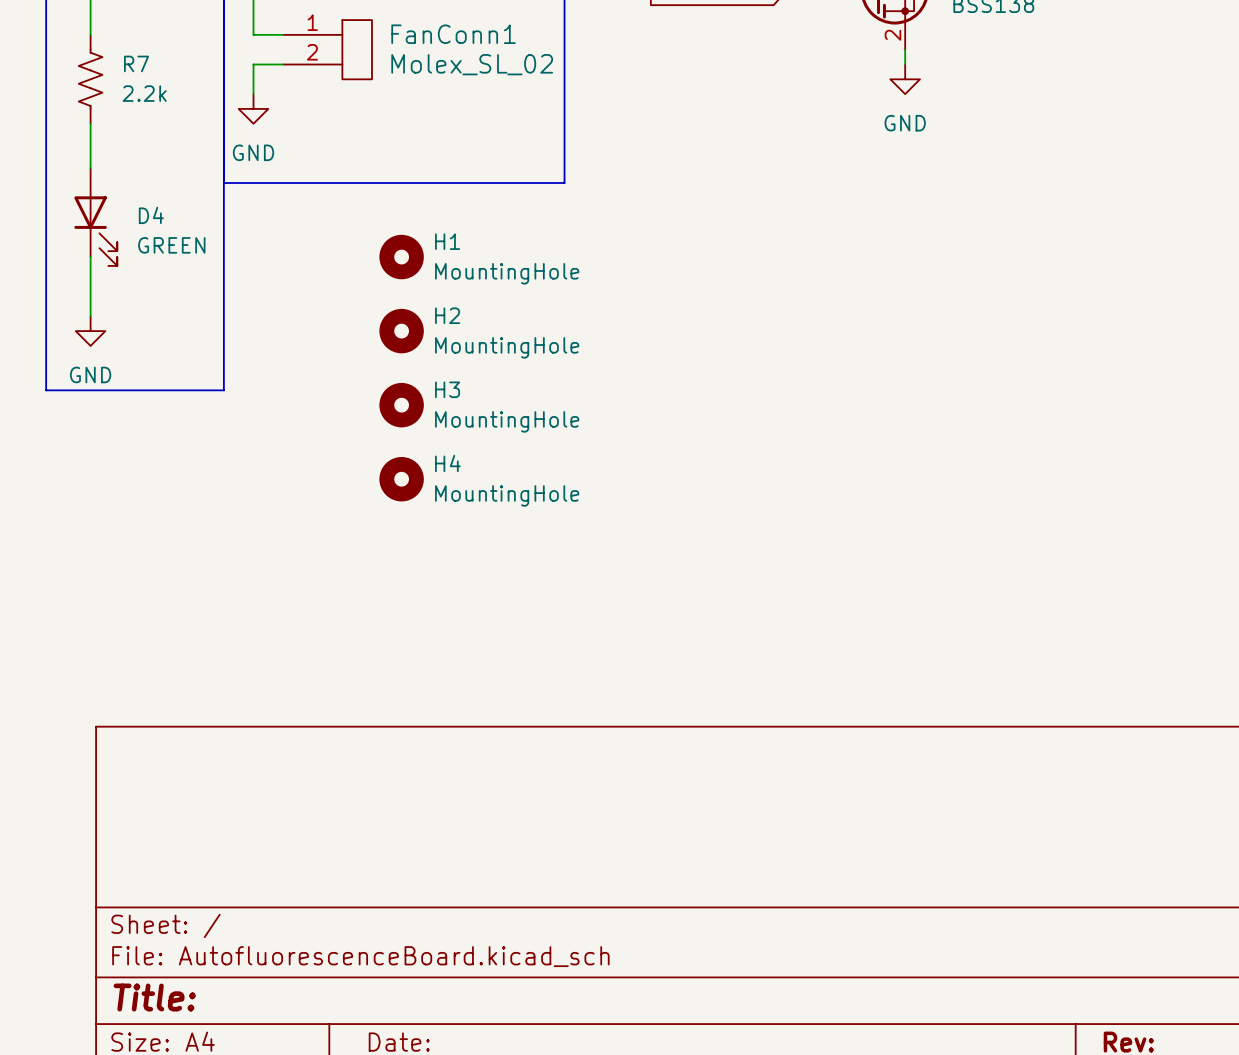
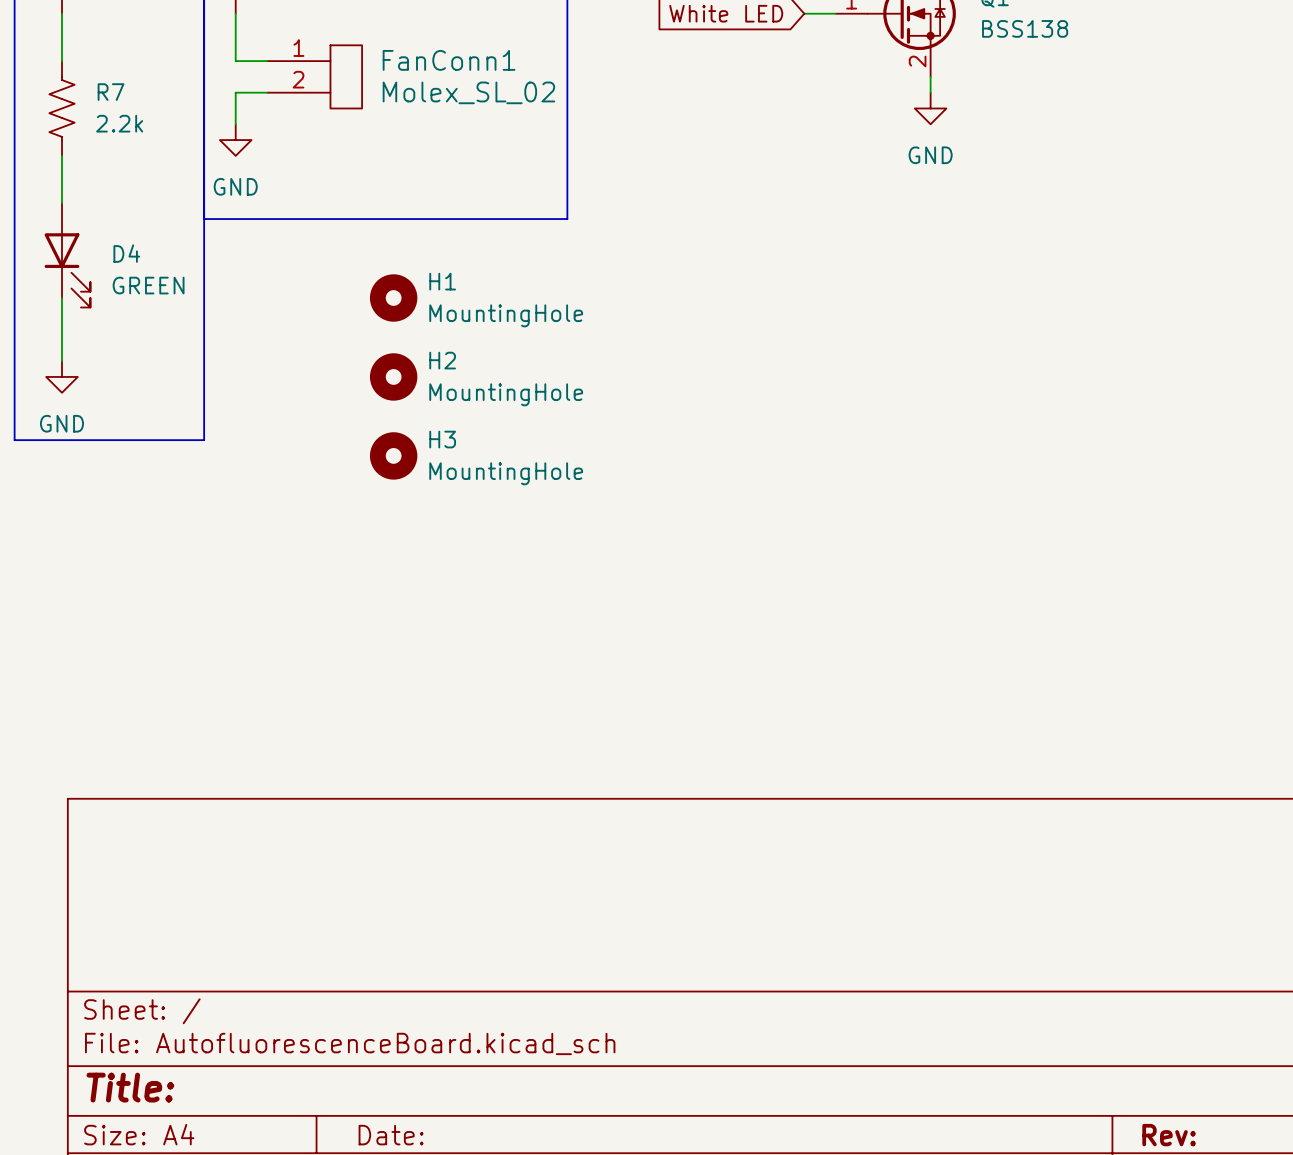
H4: MountingHole (401, 479) -> none

